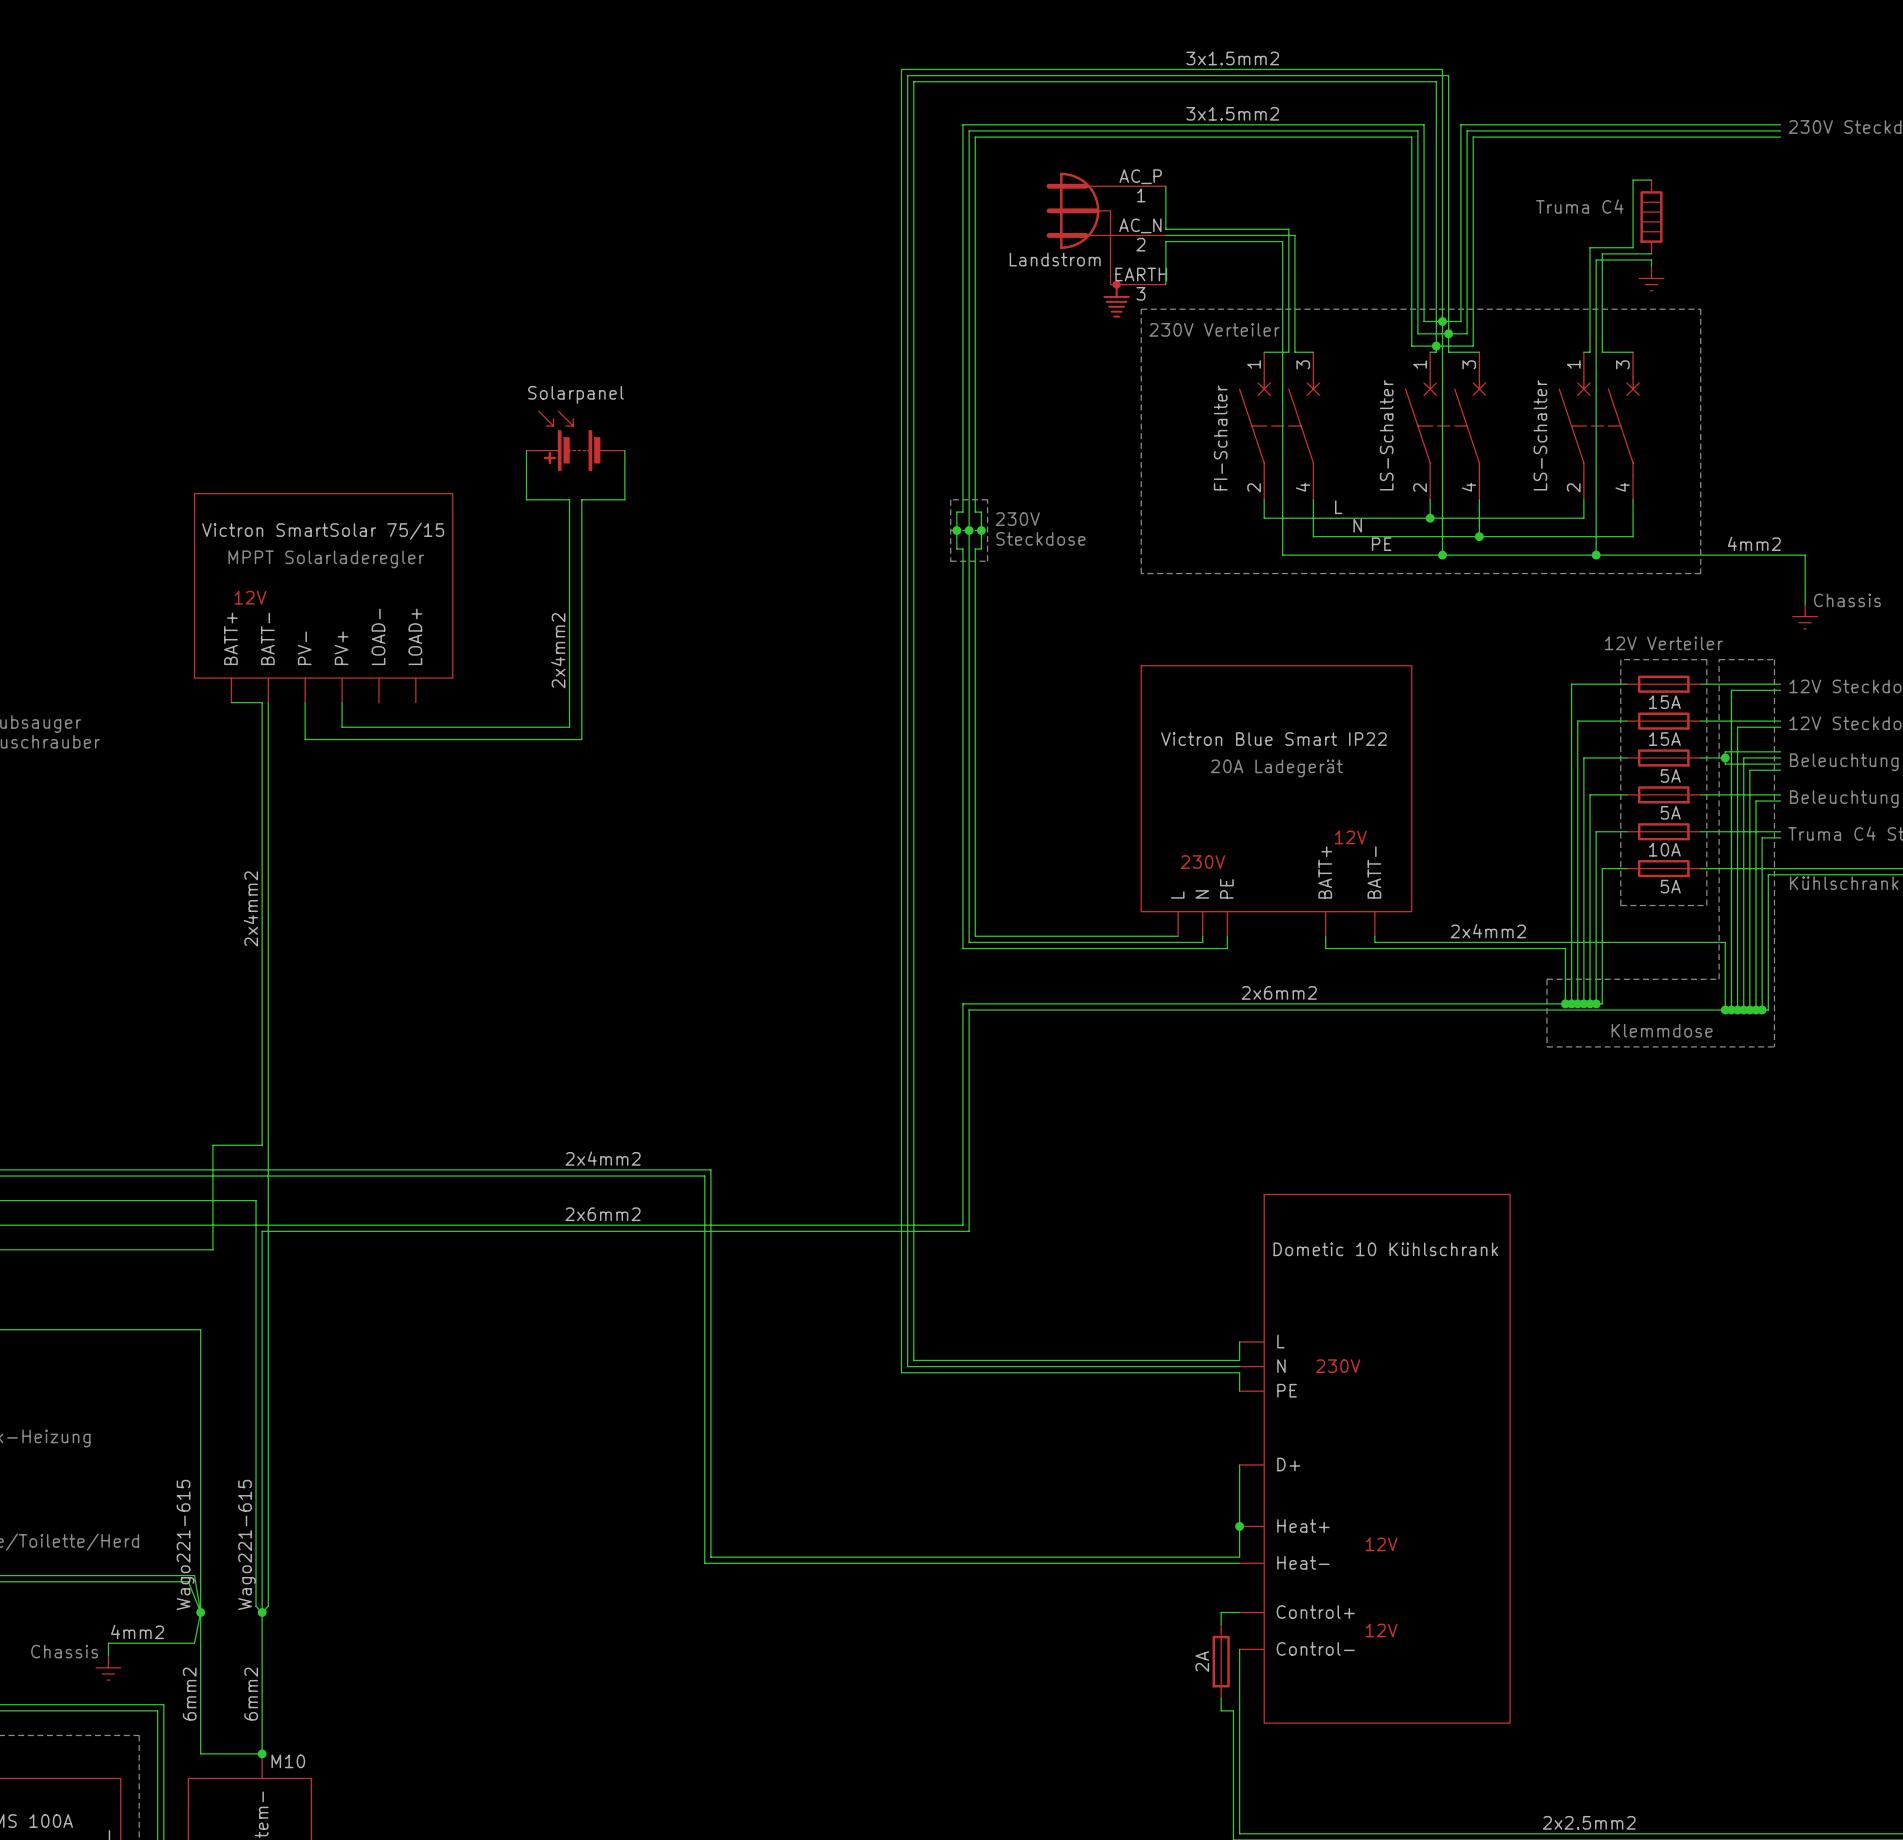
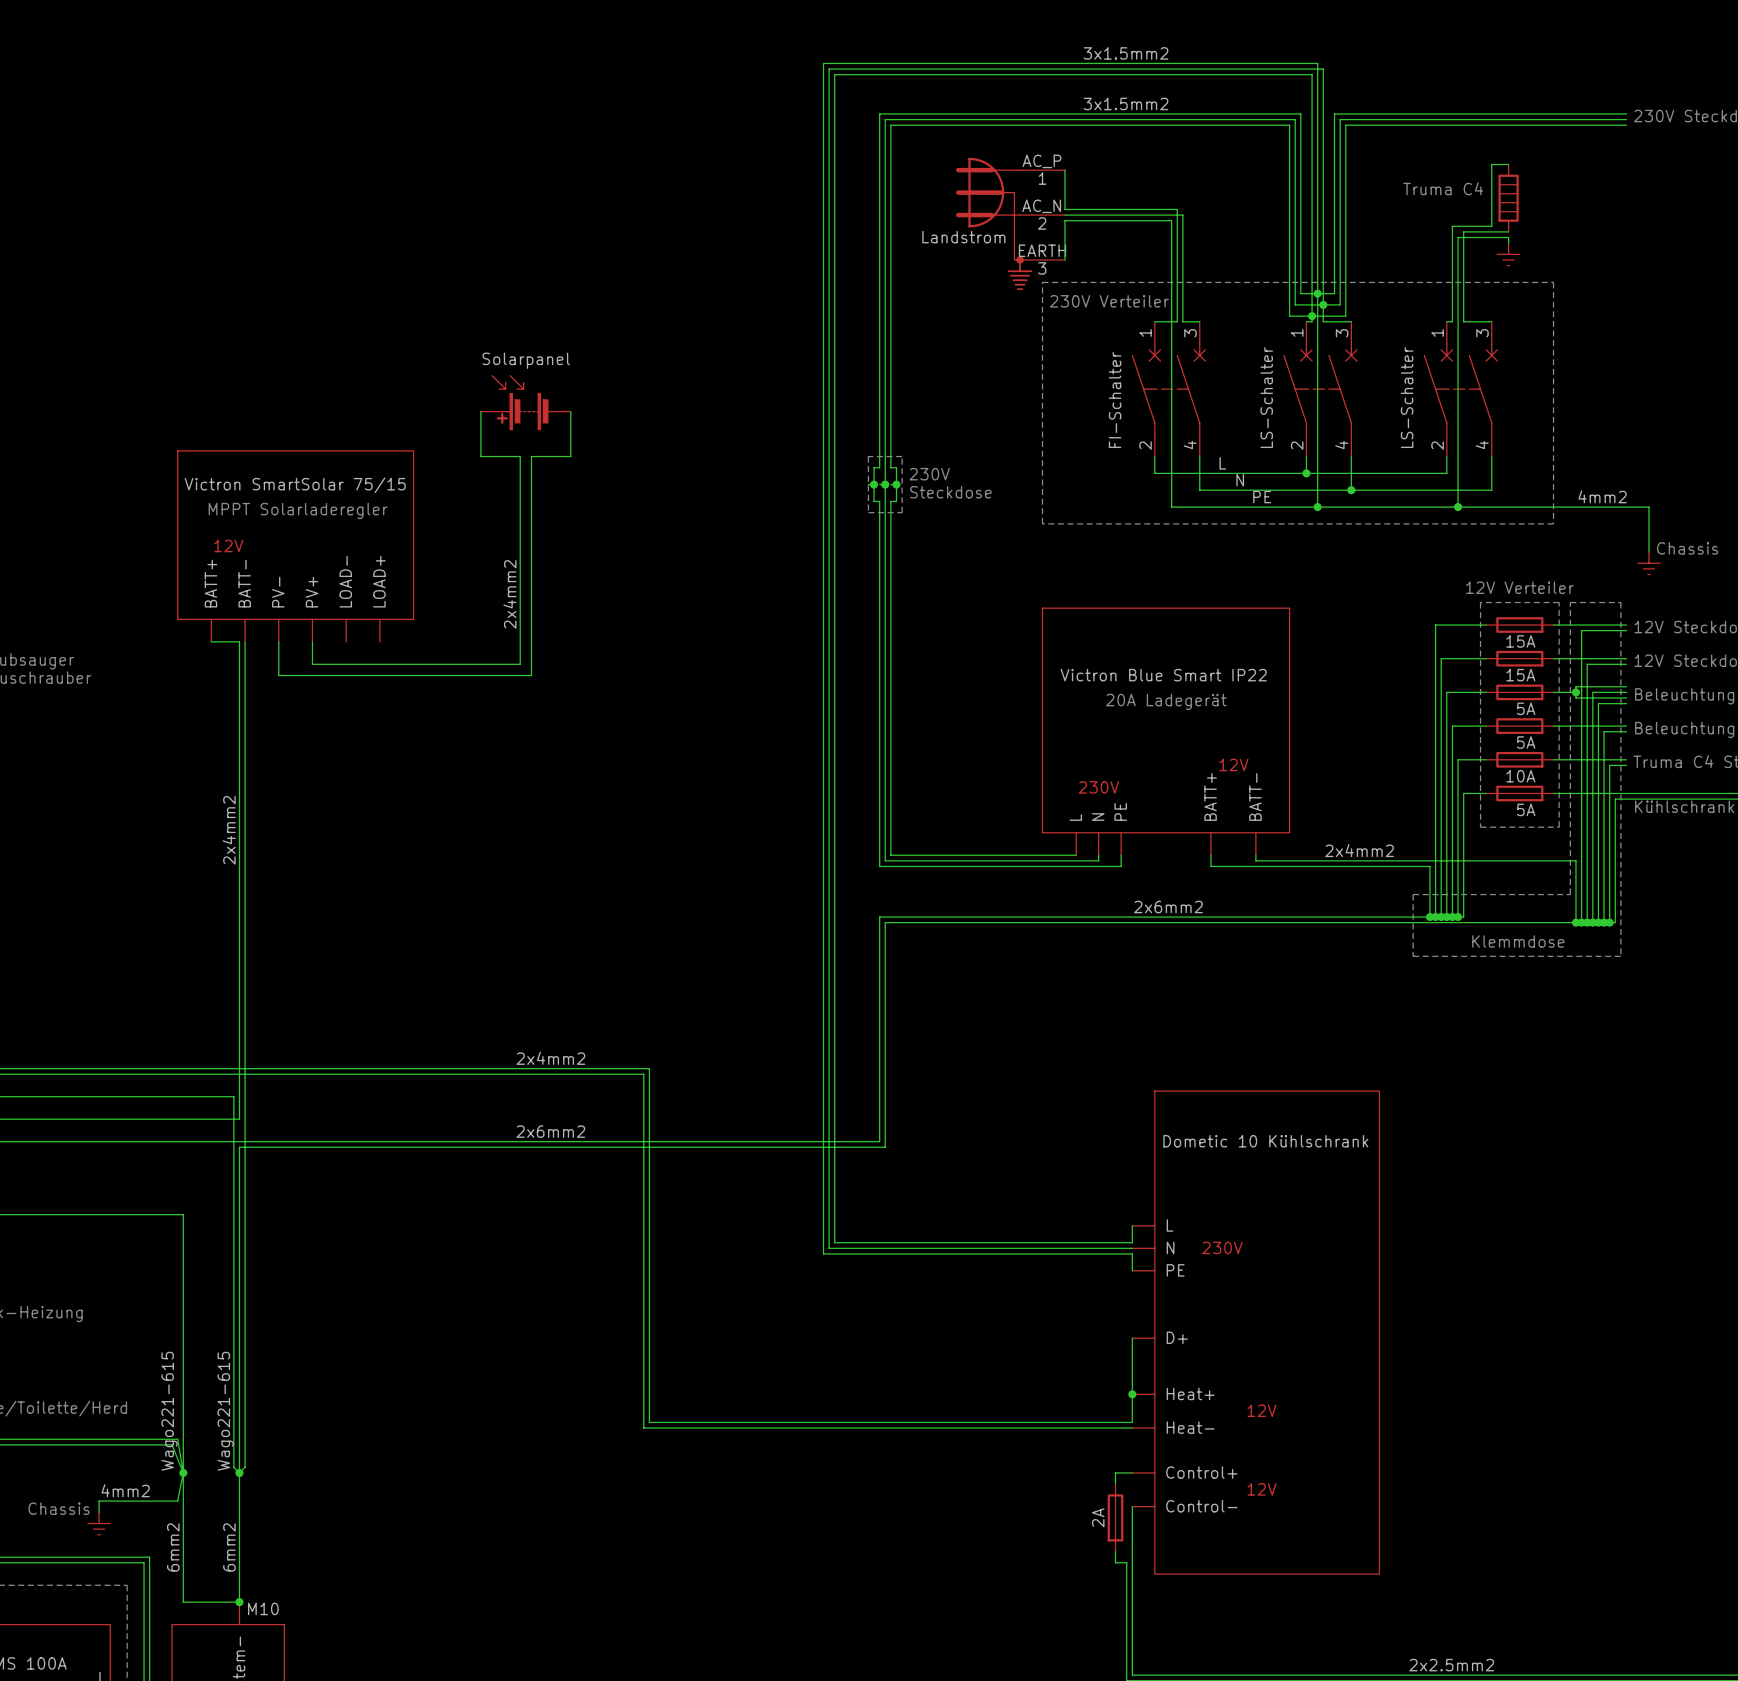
wire: (262, 1145) (212, 1145) (212, 1249) -> (239, 1046) (239, 1119)
label position: 2x6mm2 (602, 1214) -> 2x6mm2 (550, 1131)
wire: (262, 1225) (962, 1225) -> (194, 1141) (879, 1141) (879, 1119)
wire: (969, 1231) (262, 1231) (262, 1255) -> (885, 1124) (885, 1147) (239, 1147)

